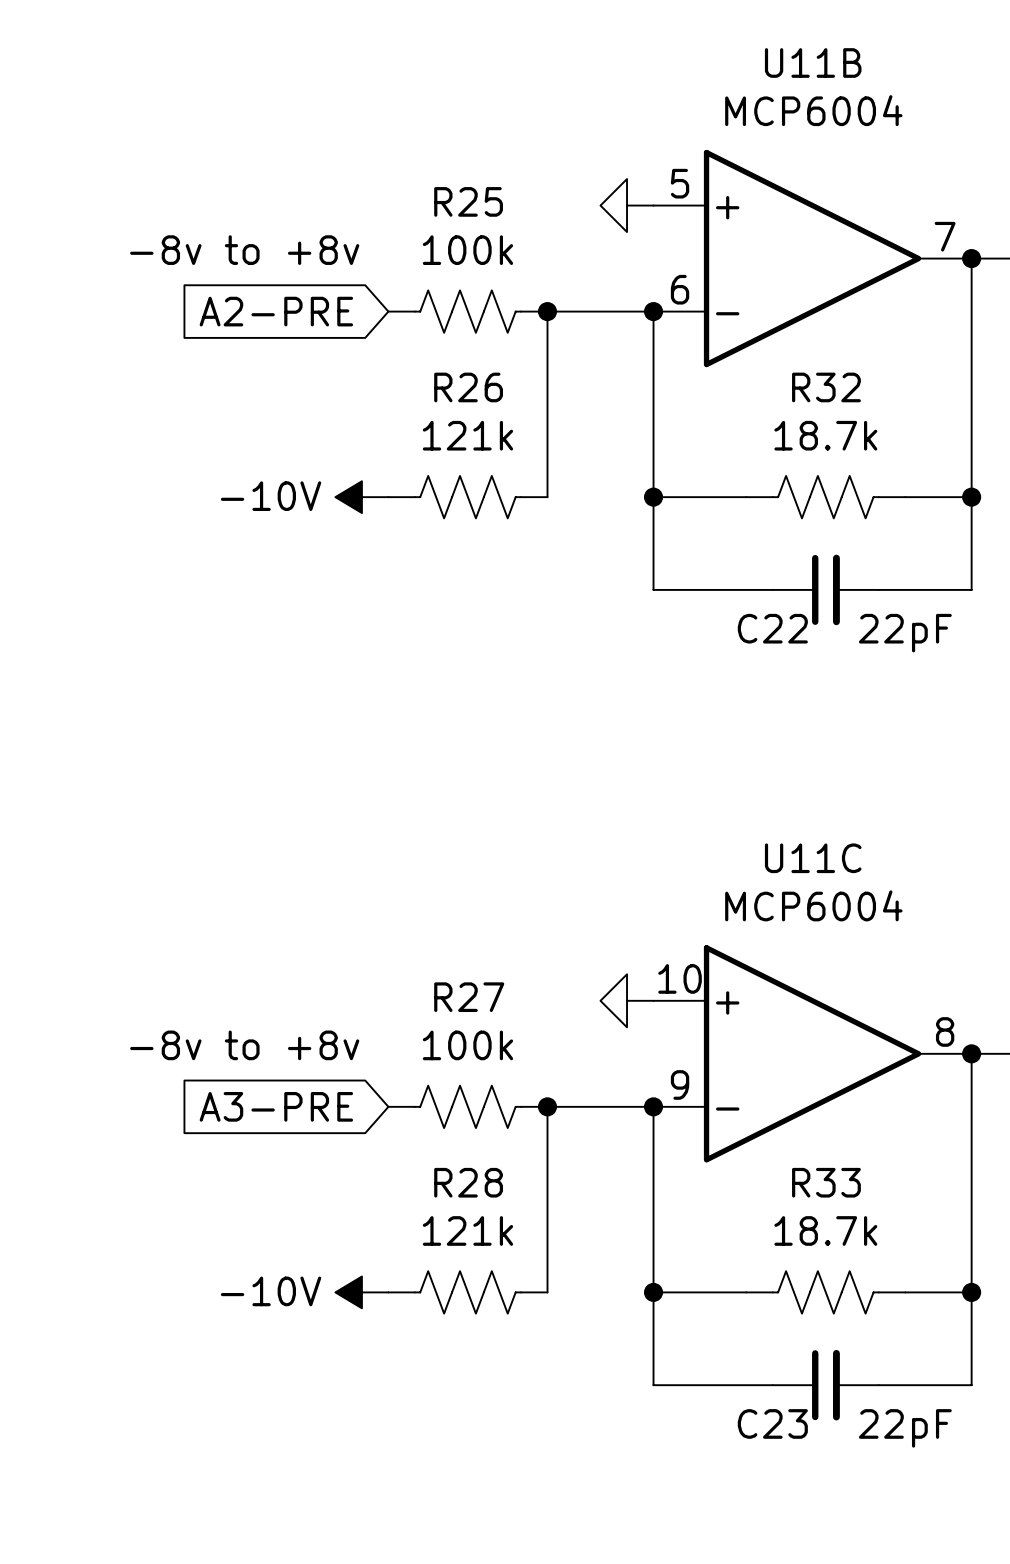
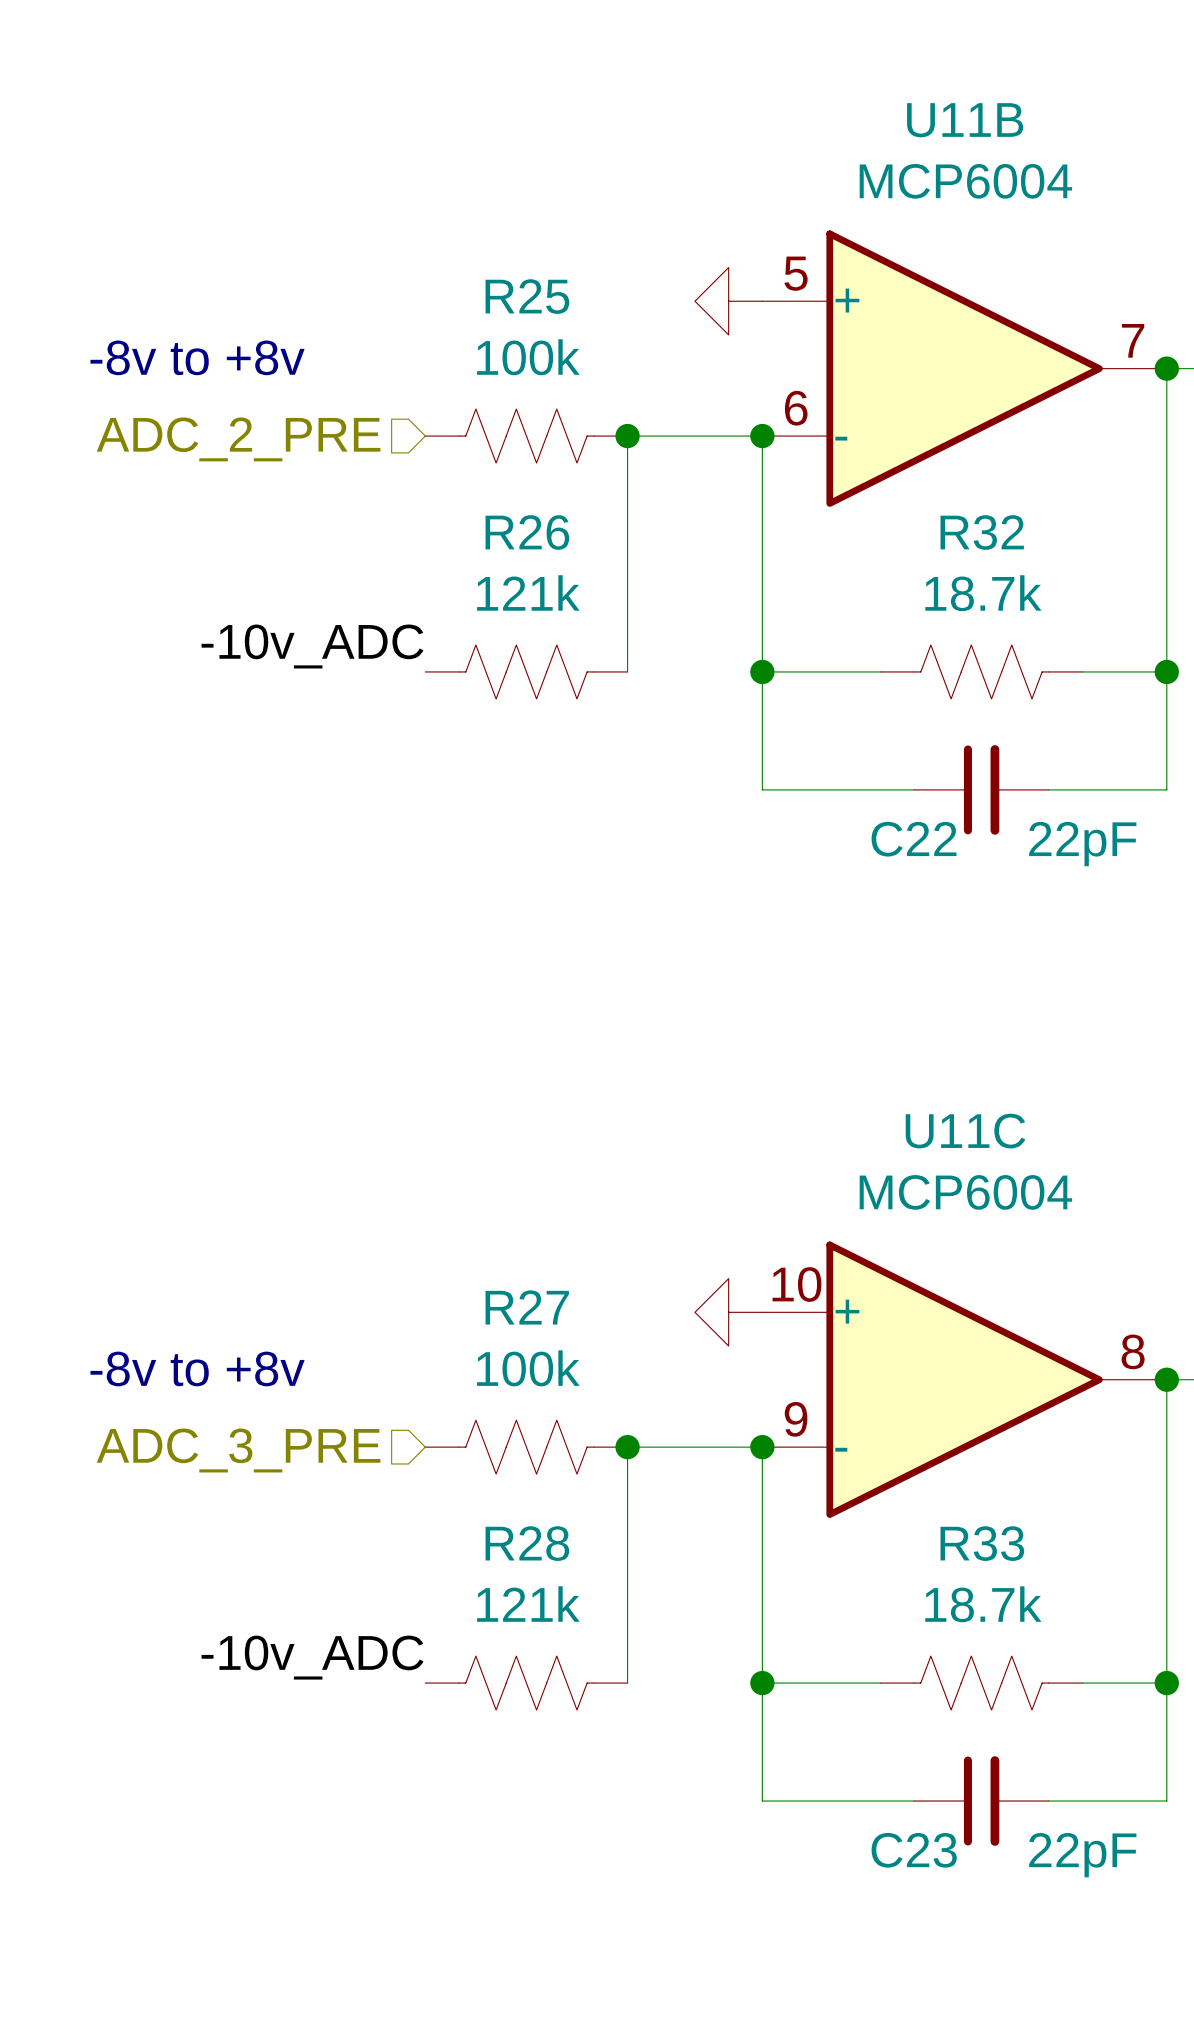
hierarchical label: none -> ADC_2_PRE (238, 439)
global label: A2-PRE (276, 311) -> none
label: none -> -10v_ADC (312, 646)
power symbol: -10V (361, 497) -> none
global label: A3-PRE (276, 1106) -> none
hierarchical label: none -> ADC_3_PRE (238, 1450)
label: none -> -10v_ADC (312, 1657)
power symbol: -10V (361, 1292) -> none

